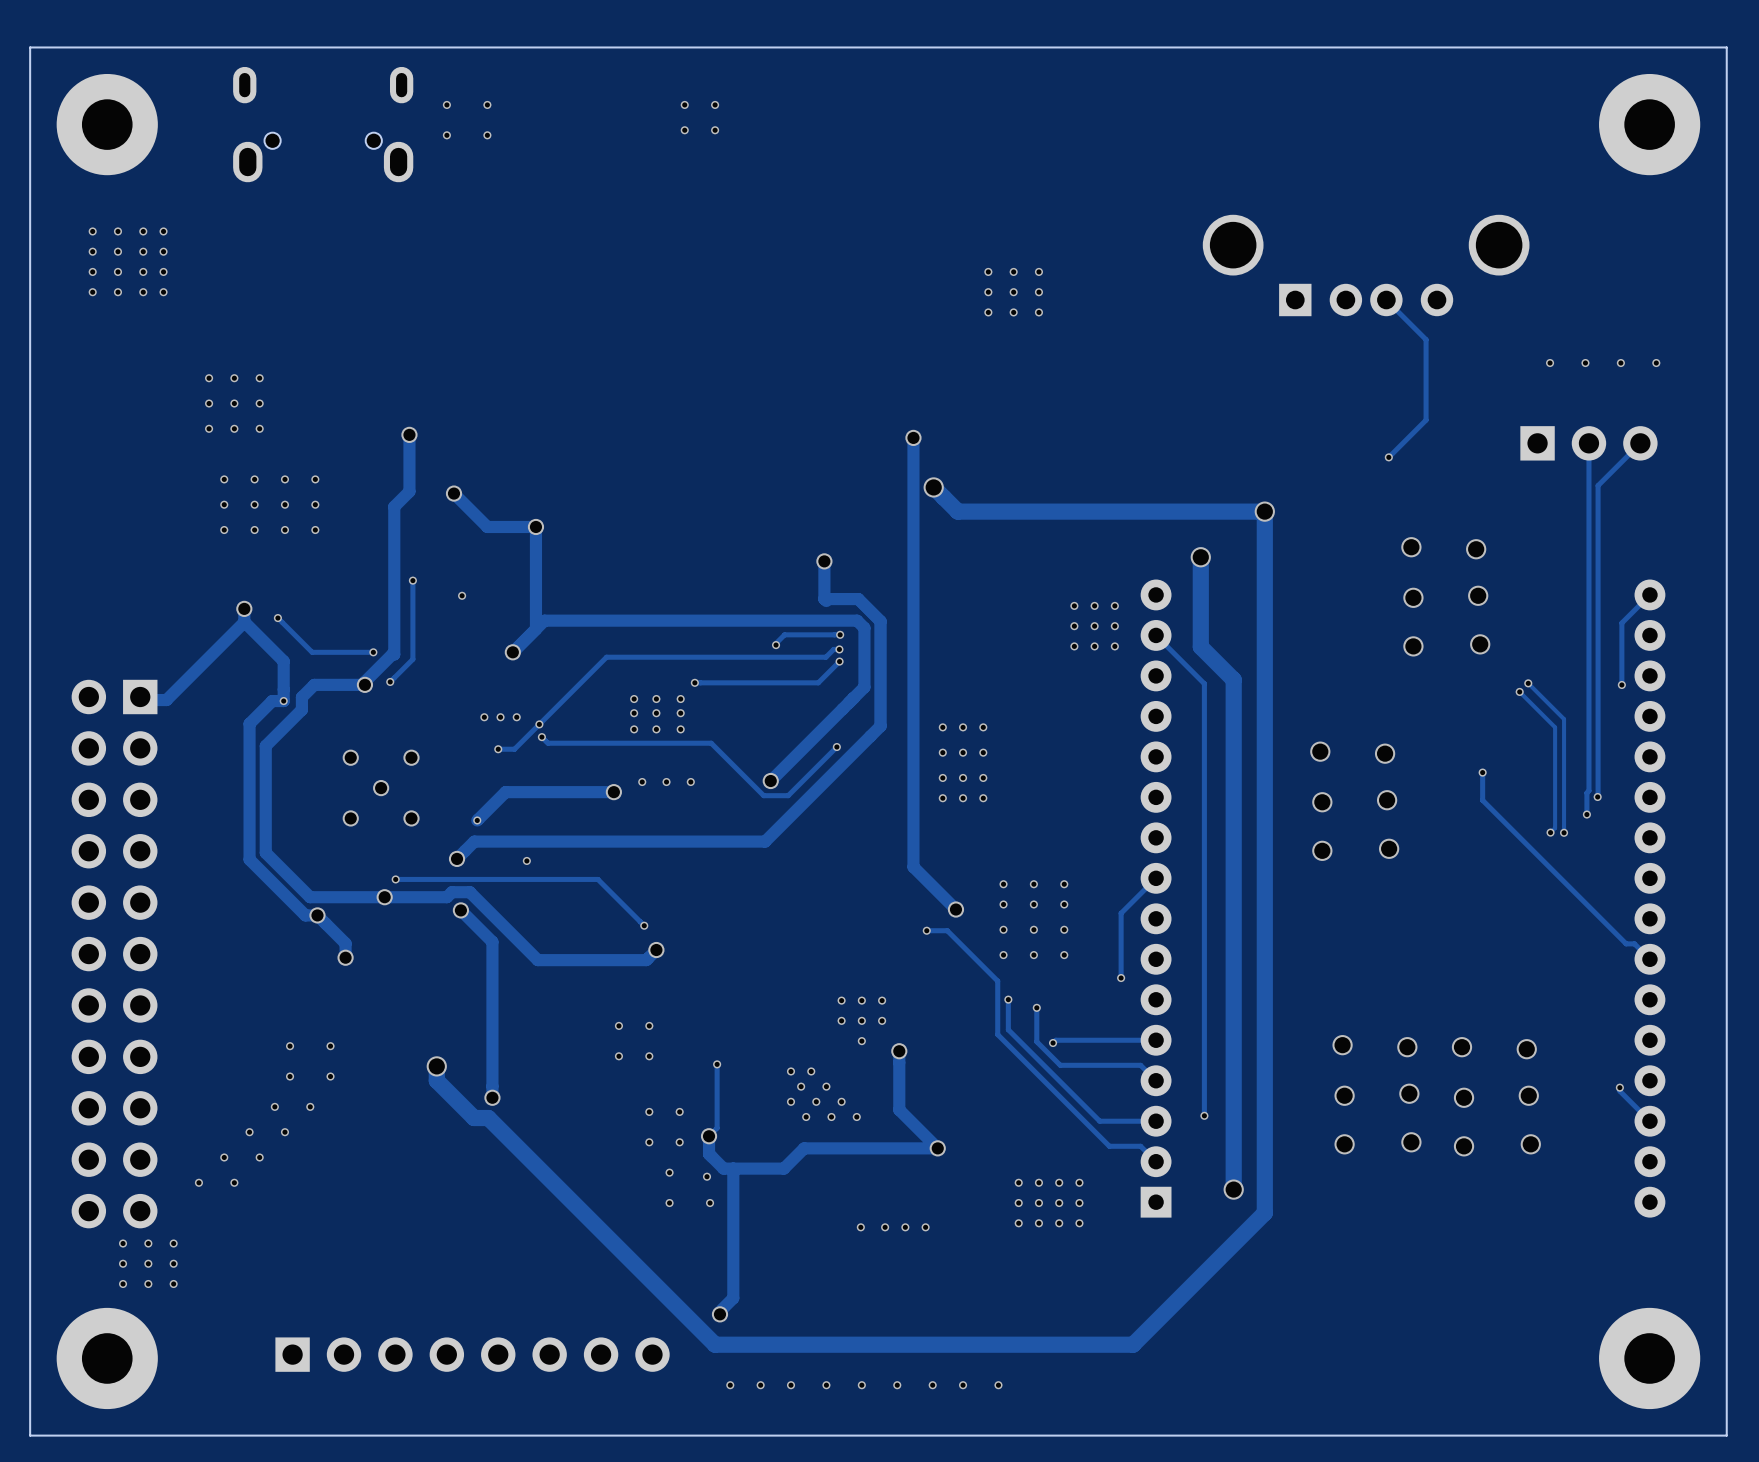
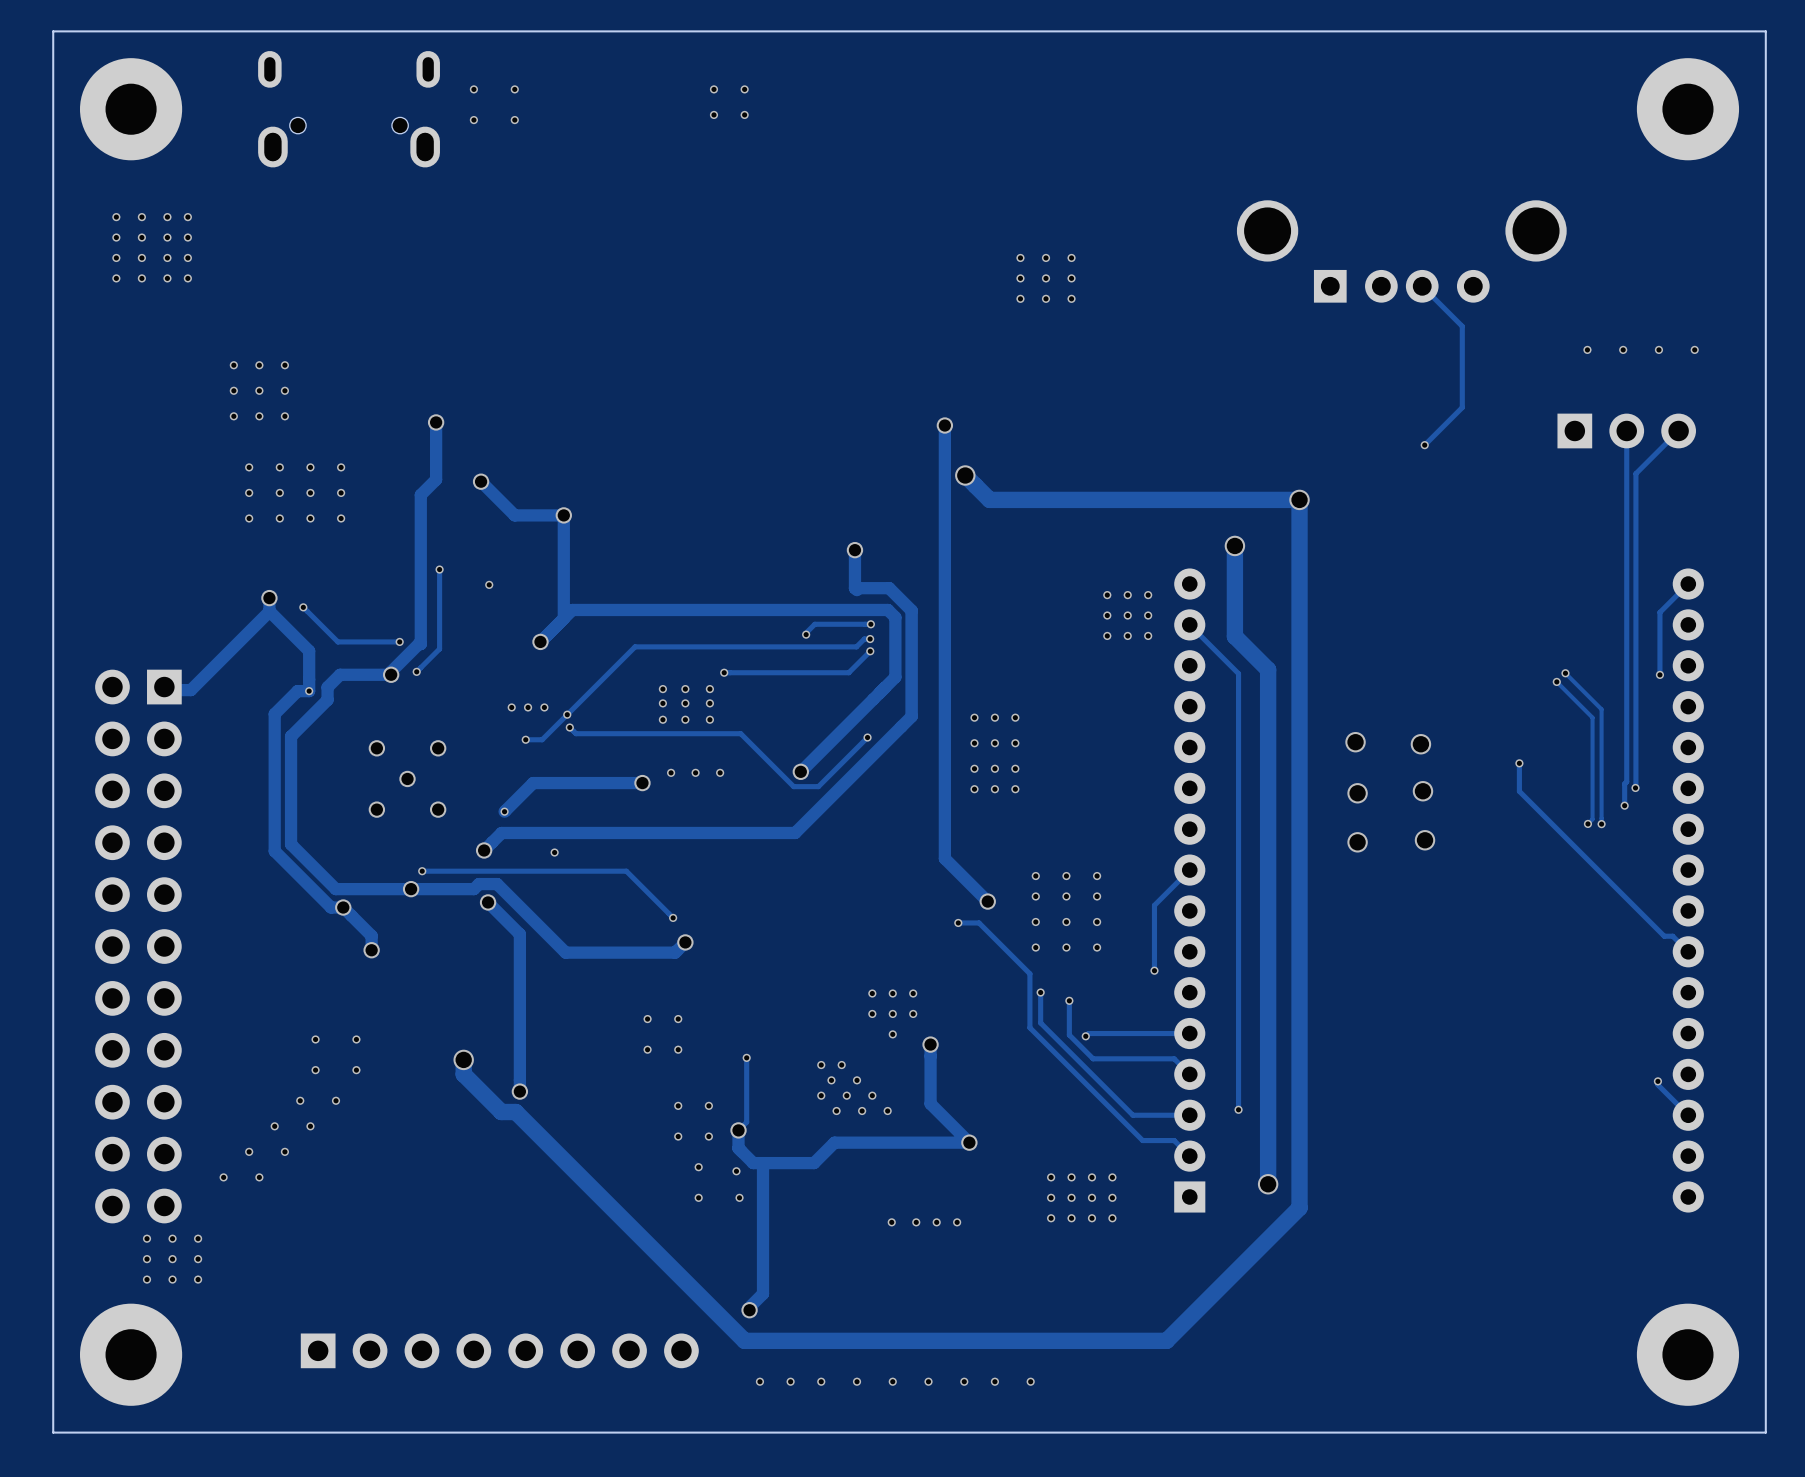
via: (1411, 547) -> none
via: (1476, 549) -> none
via: (1478, 595) -> none
via: (1413, 597) -> none
via: (1480, 644) -> none
via: (1413, 646) -> none
via: (1342, 1045) -> none
via: (1407, 1047) -> none
via: (1462, 1047) -> none
via: (1526, 1049) -> none
via: (1409, 1093) -> none
via: (1344, 1095) -> none
via: (1528, 1095) -> none
via: (1464, 1097) -> none
via: (1411, 1142) -> none
via: (1344, 1144) -> none
via: (1530, 1144) -> none
via: (1464, 1146) -> none

